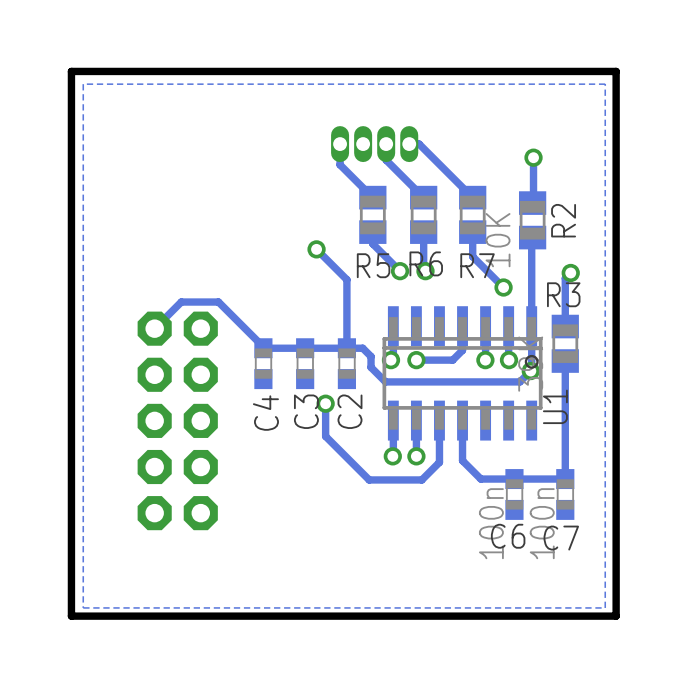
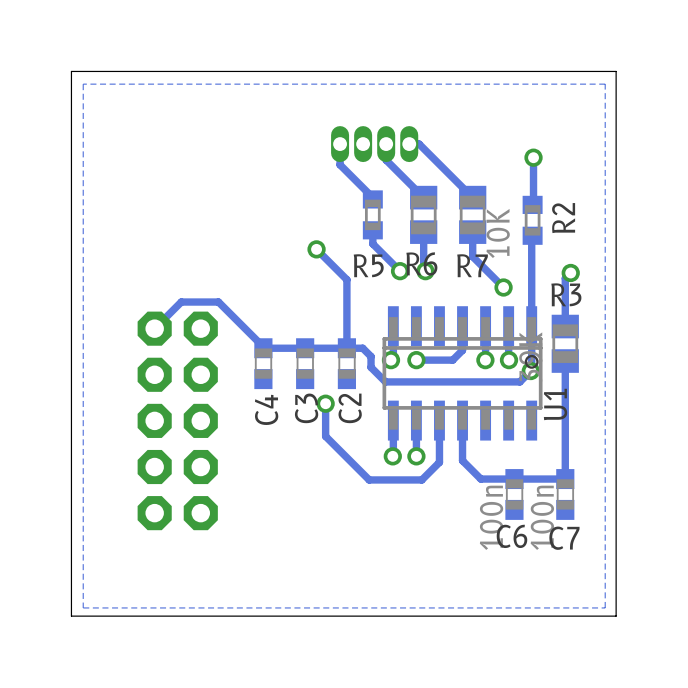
board edge width: thick (616, 71) (616, 616) (71, 616) (71, 71) (616, 71) -> thin (616, 71) (616, 616) (71, 616) (71, 71) (616, 71)
R5 footprint: [359, 185, 387, 244] -> [362, 190, 383, 240]
R2 footprint: [518, 191, 547, 250] -> [522, 195, 543, 245]

